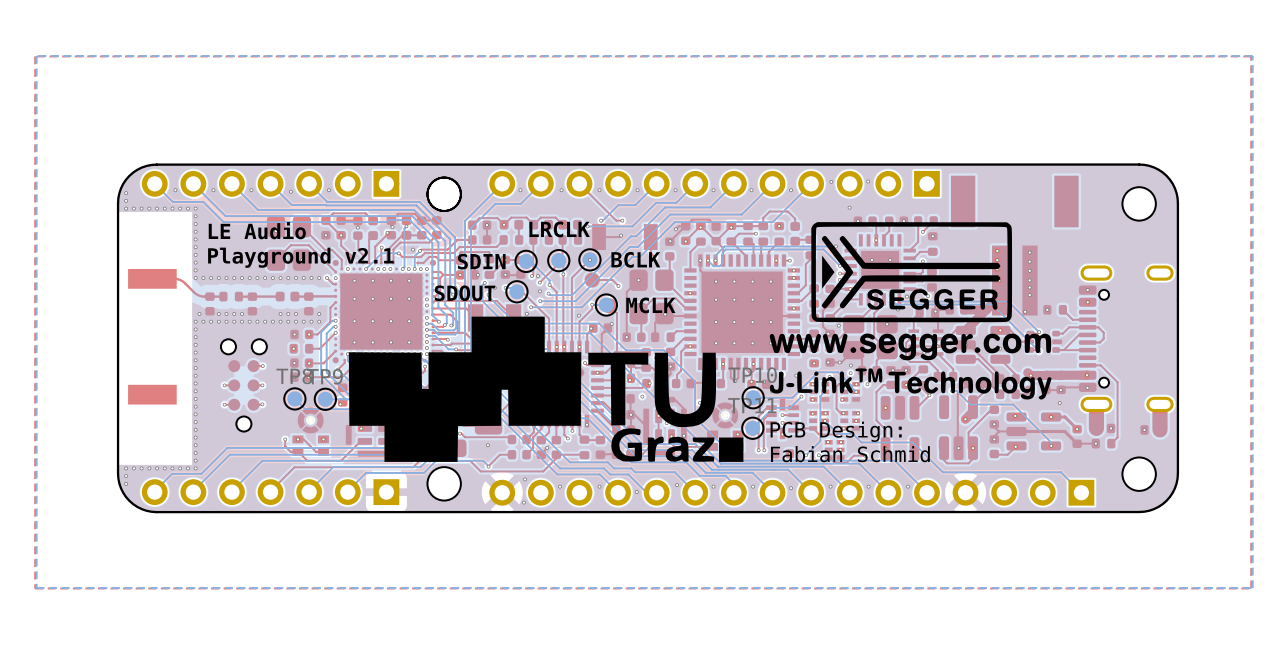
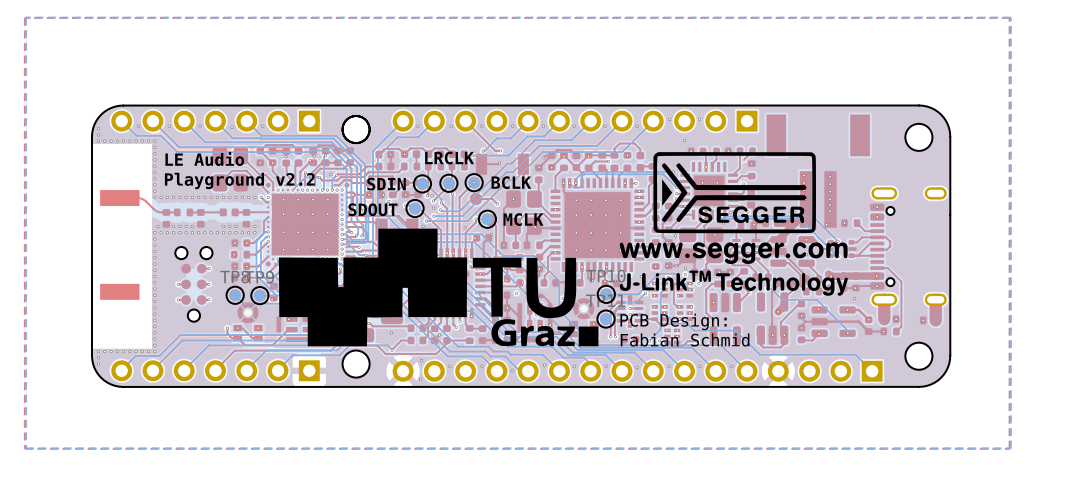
text: Playground v2.1 (300, 257) -> Playground v2.2 (239, 180)

